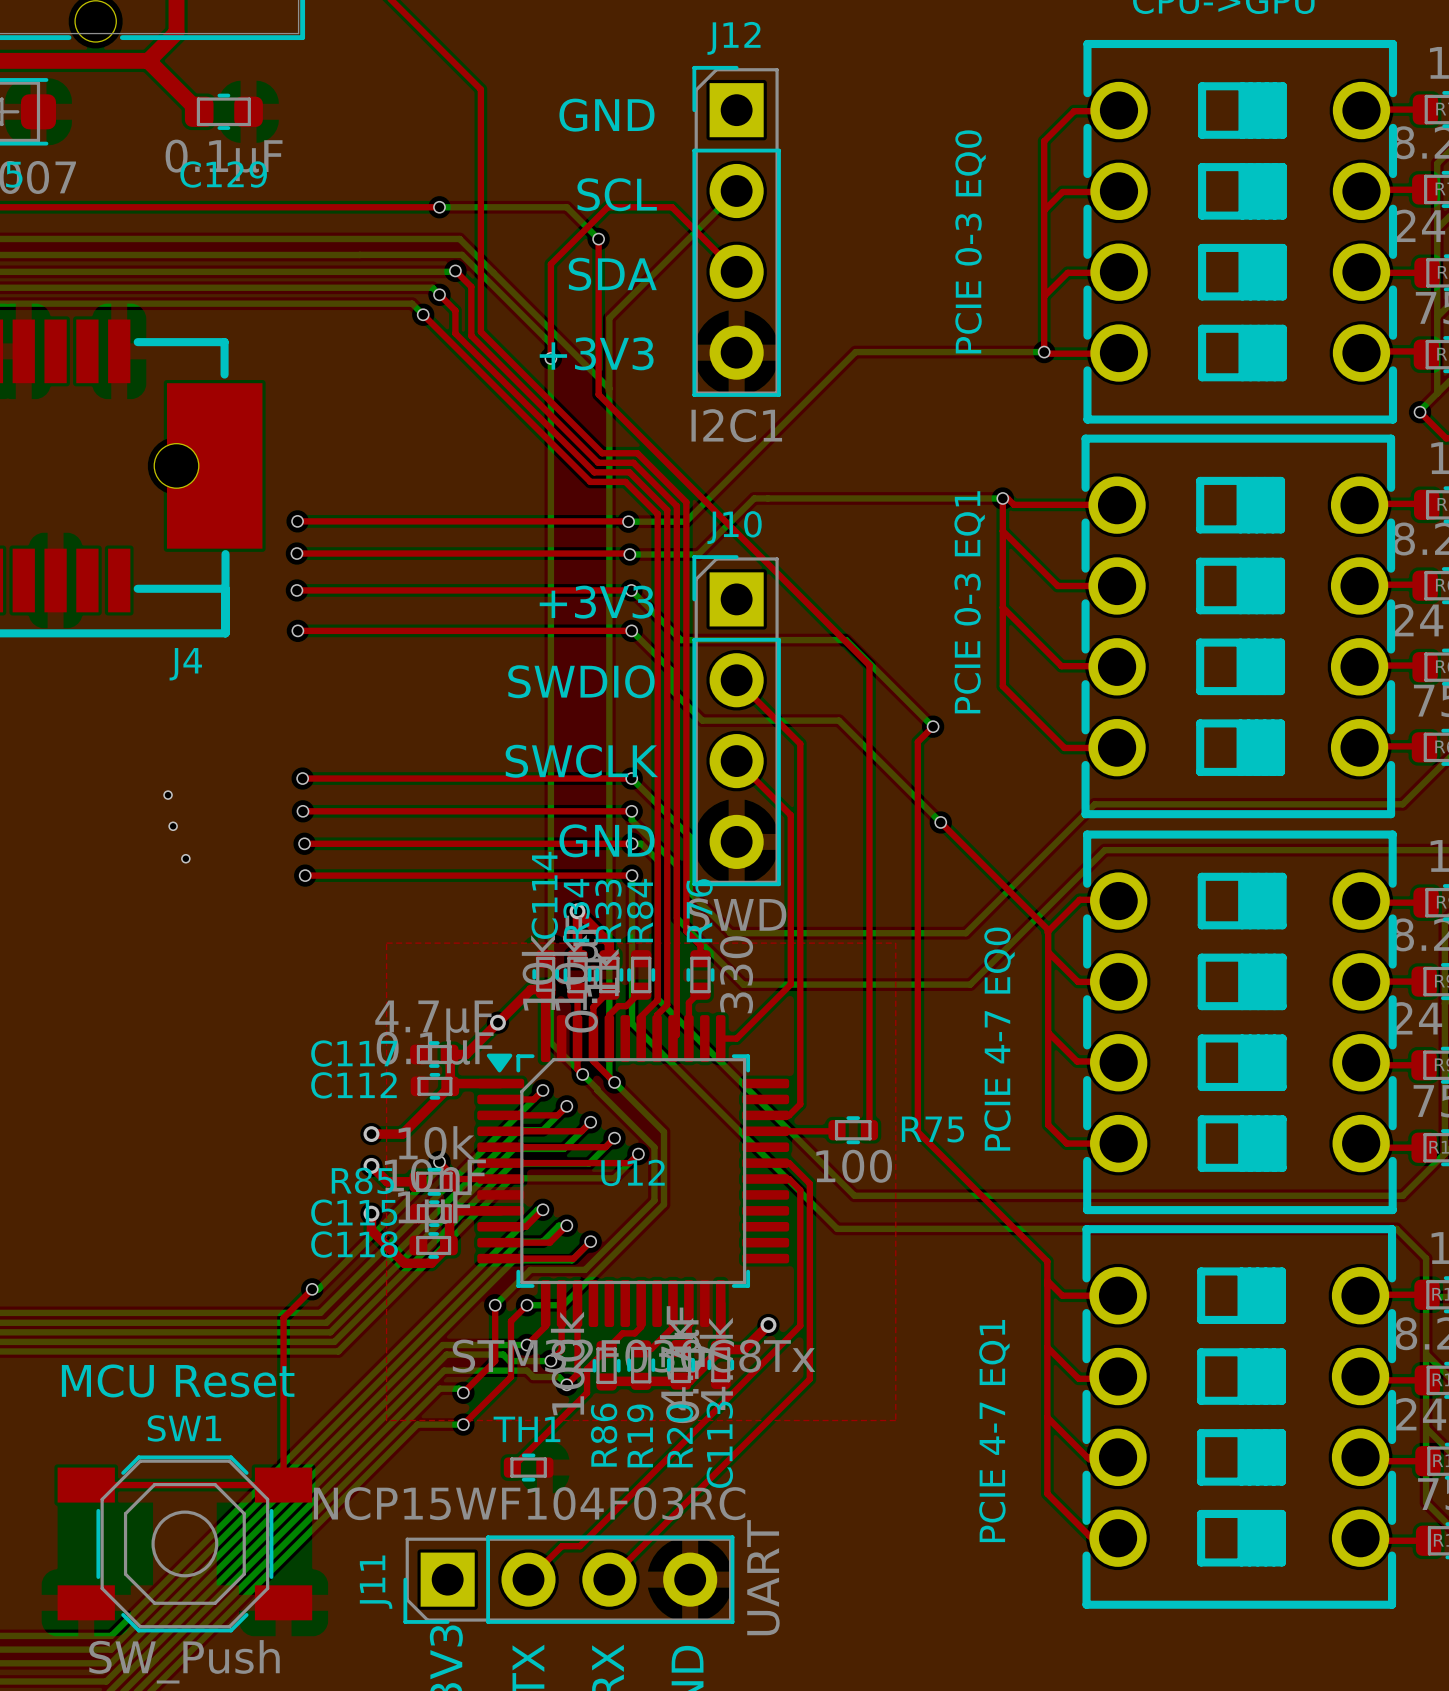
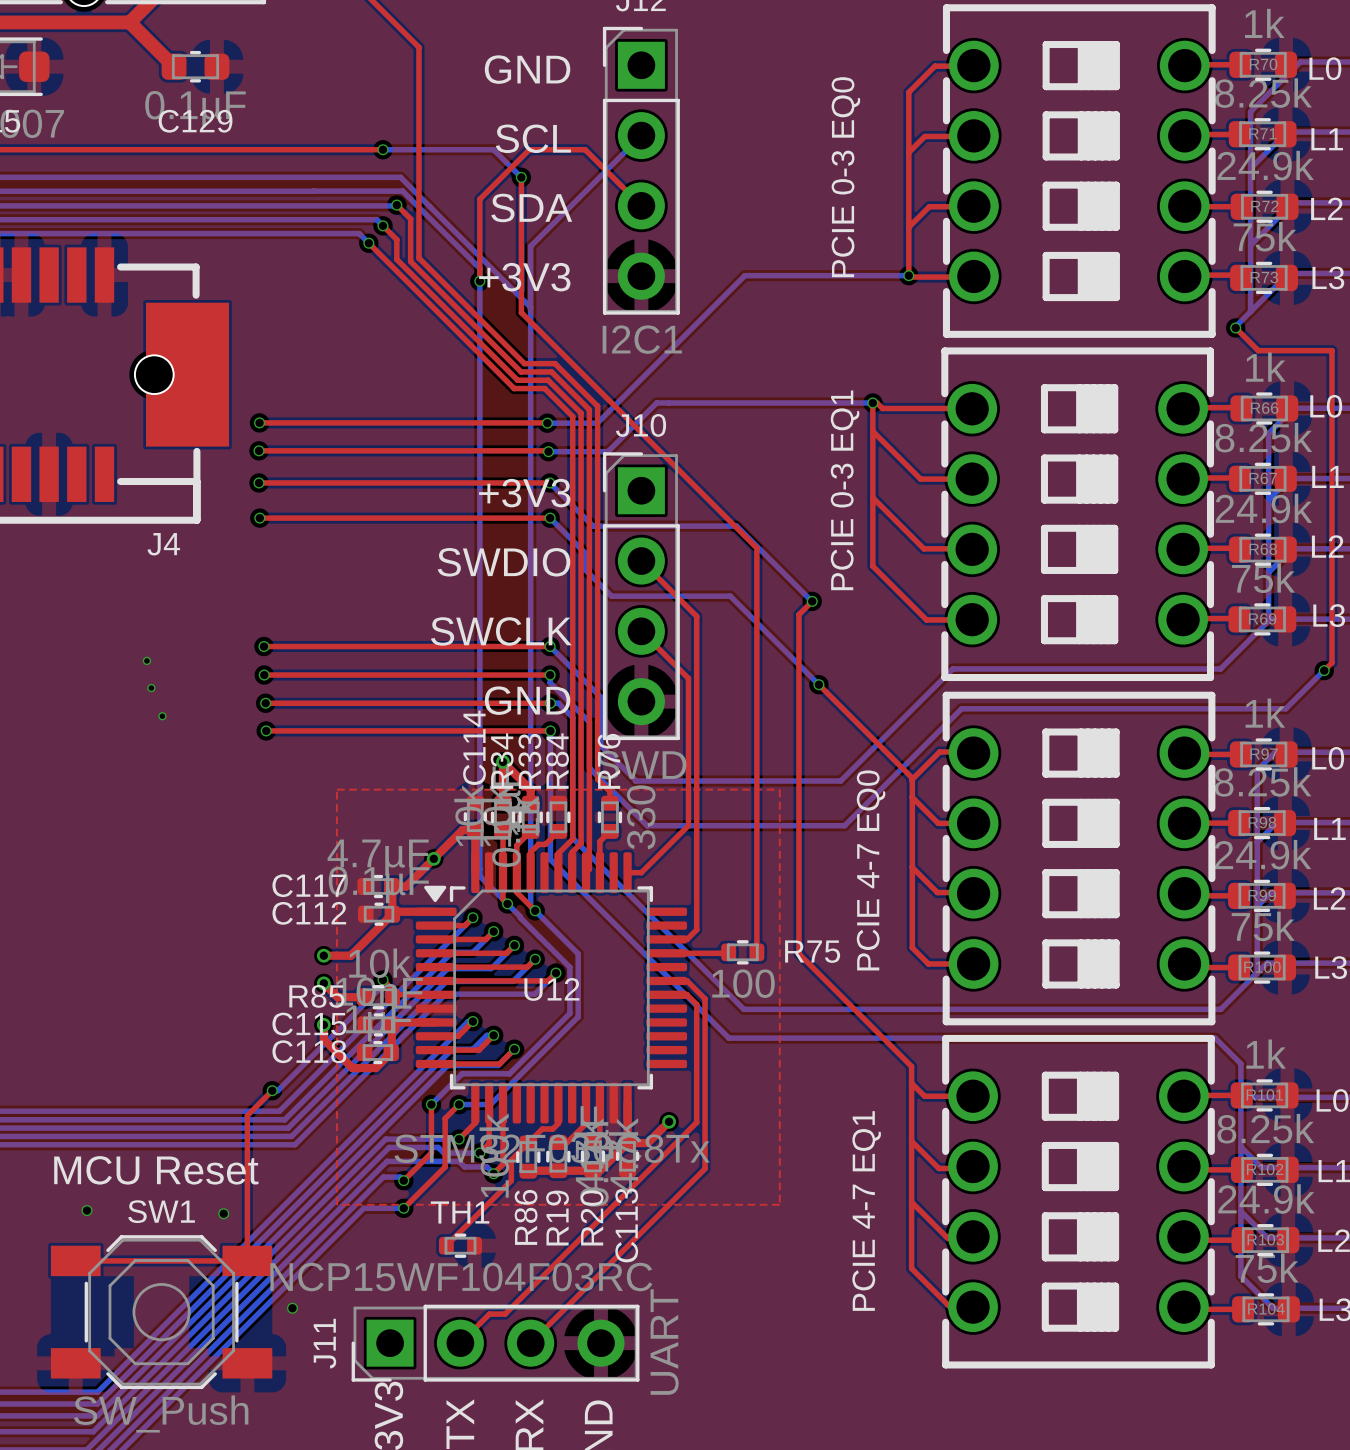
via: none -> (87, 1210)
via: none -> (223, 1213)
via: none -> (292, 1308)

